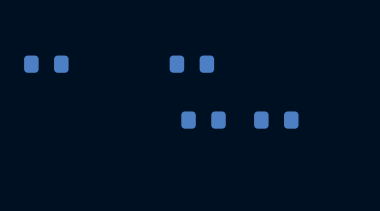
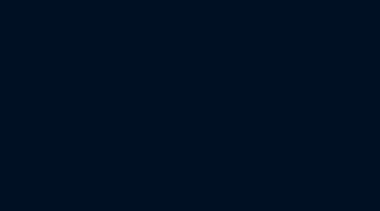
part: (46, 64) -> none
part: (191, 64) -> none
part: (203, 120) -> none
part: (276, 120) -> none

